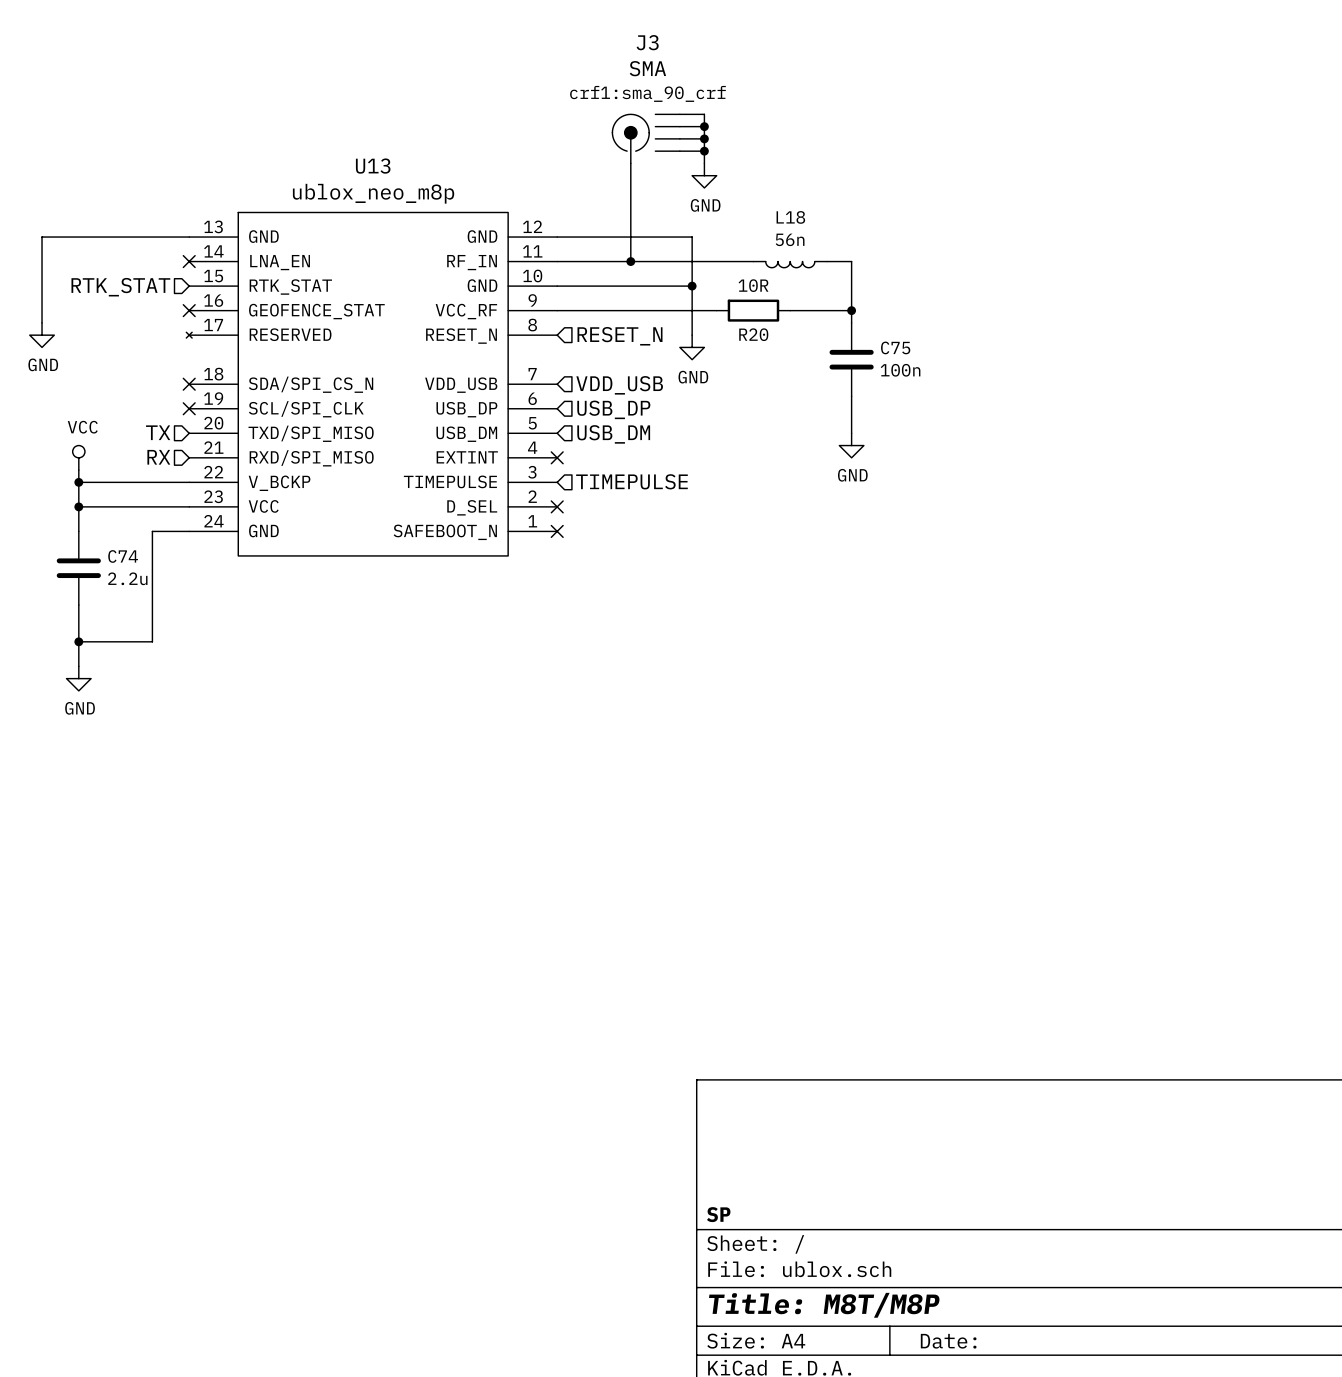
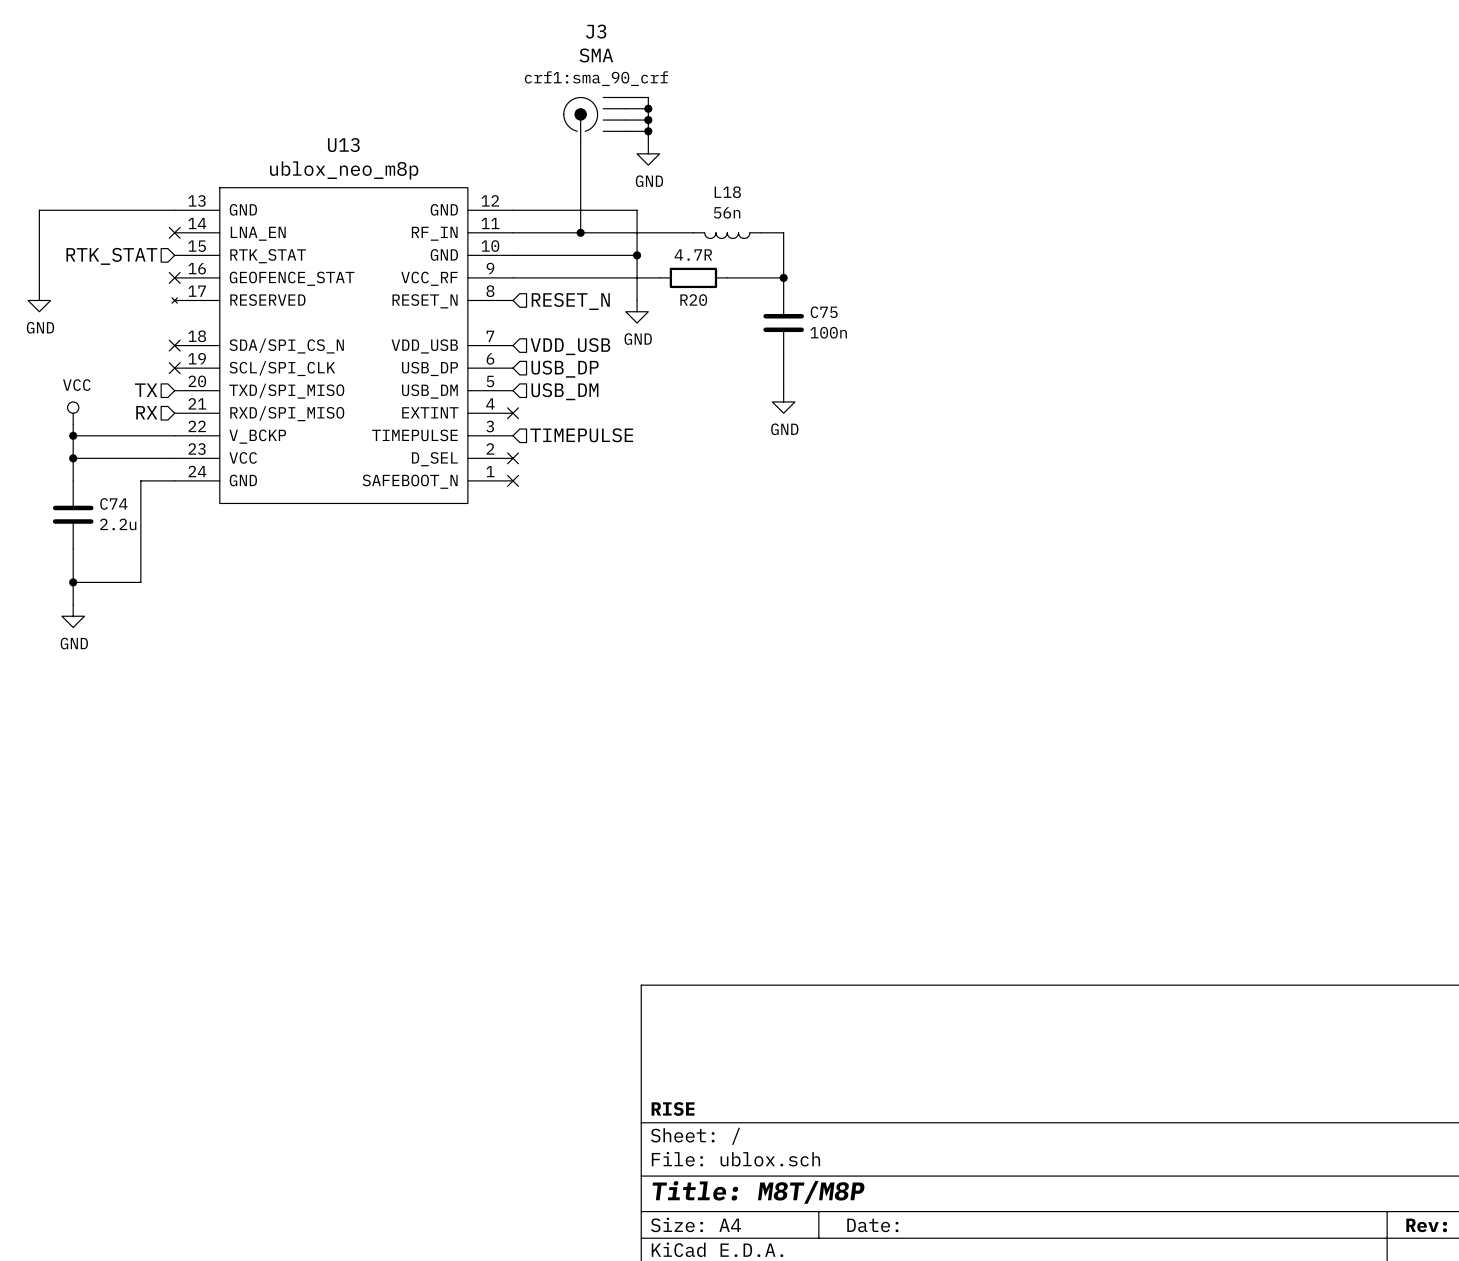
R20 value: 10R (753, 285) -> 4.7R (693, 255)
title block: SP (718, 1214) -> RISE (673, 1108)

